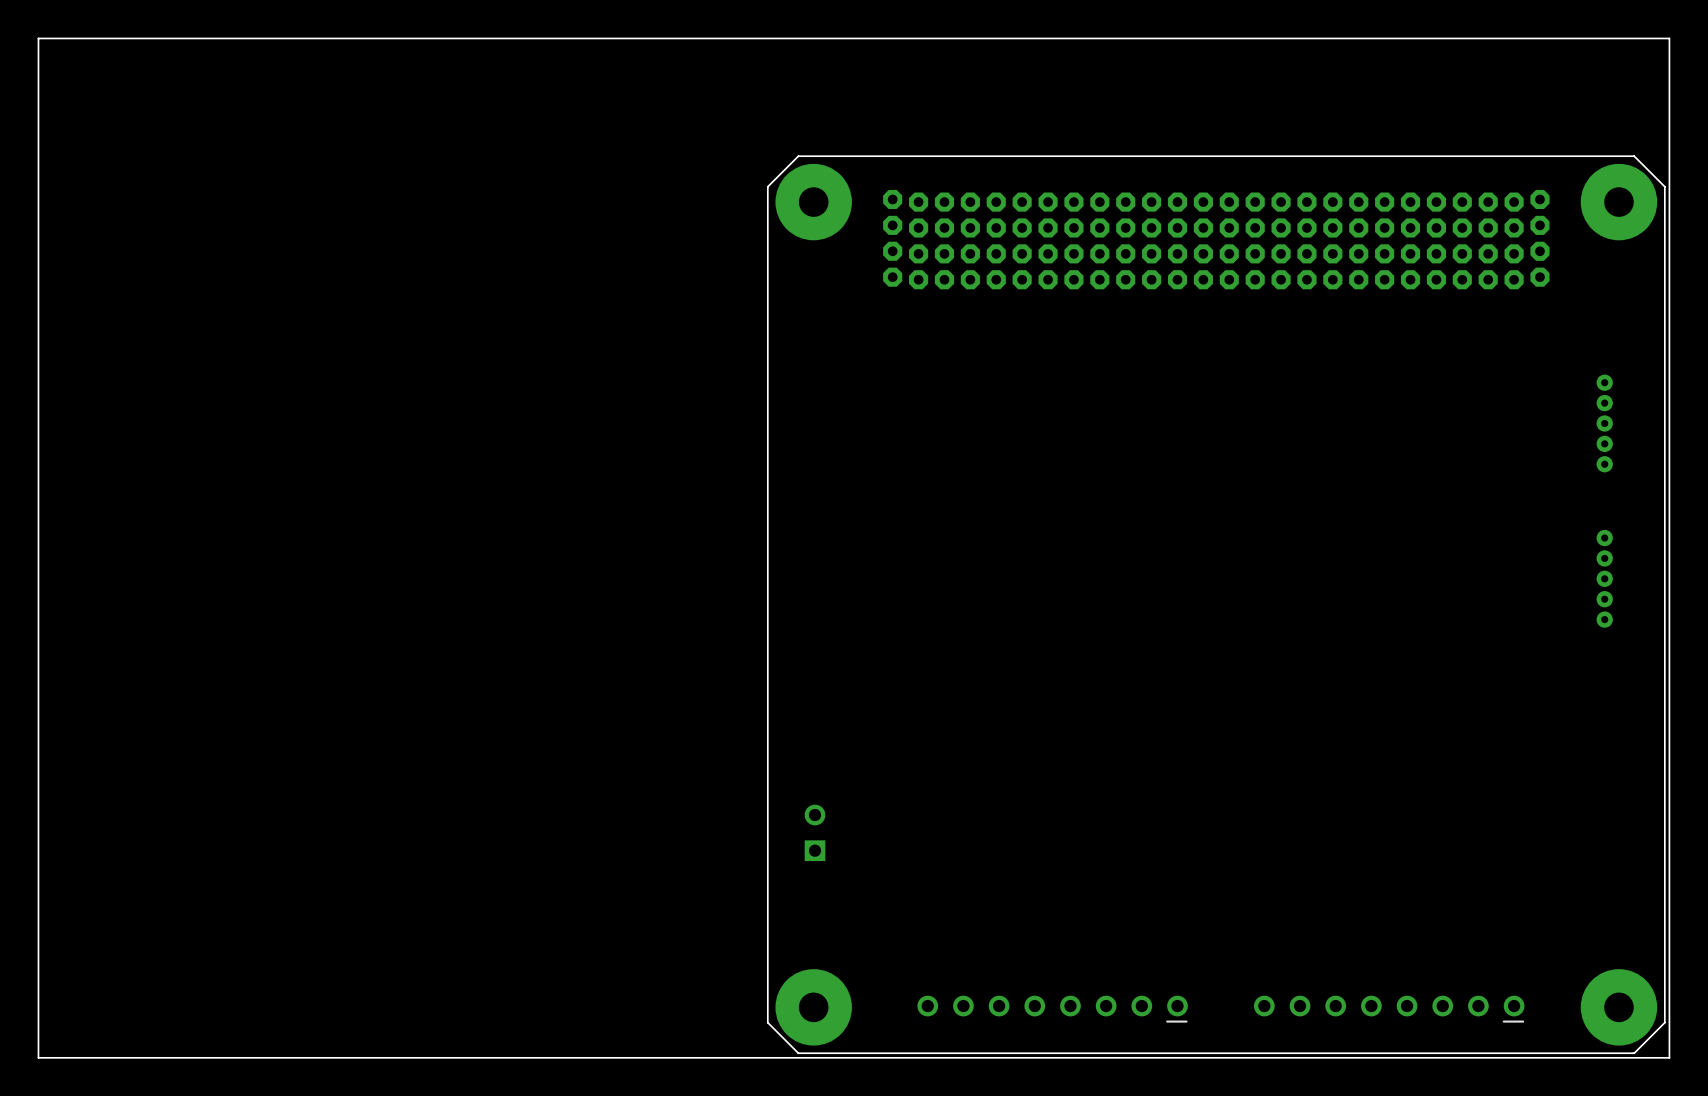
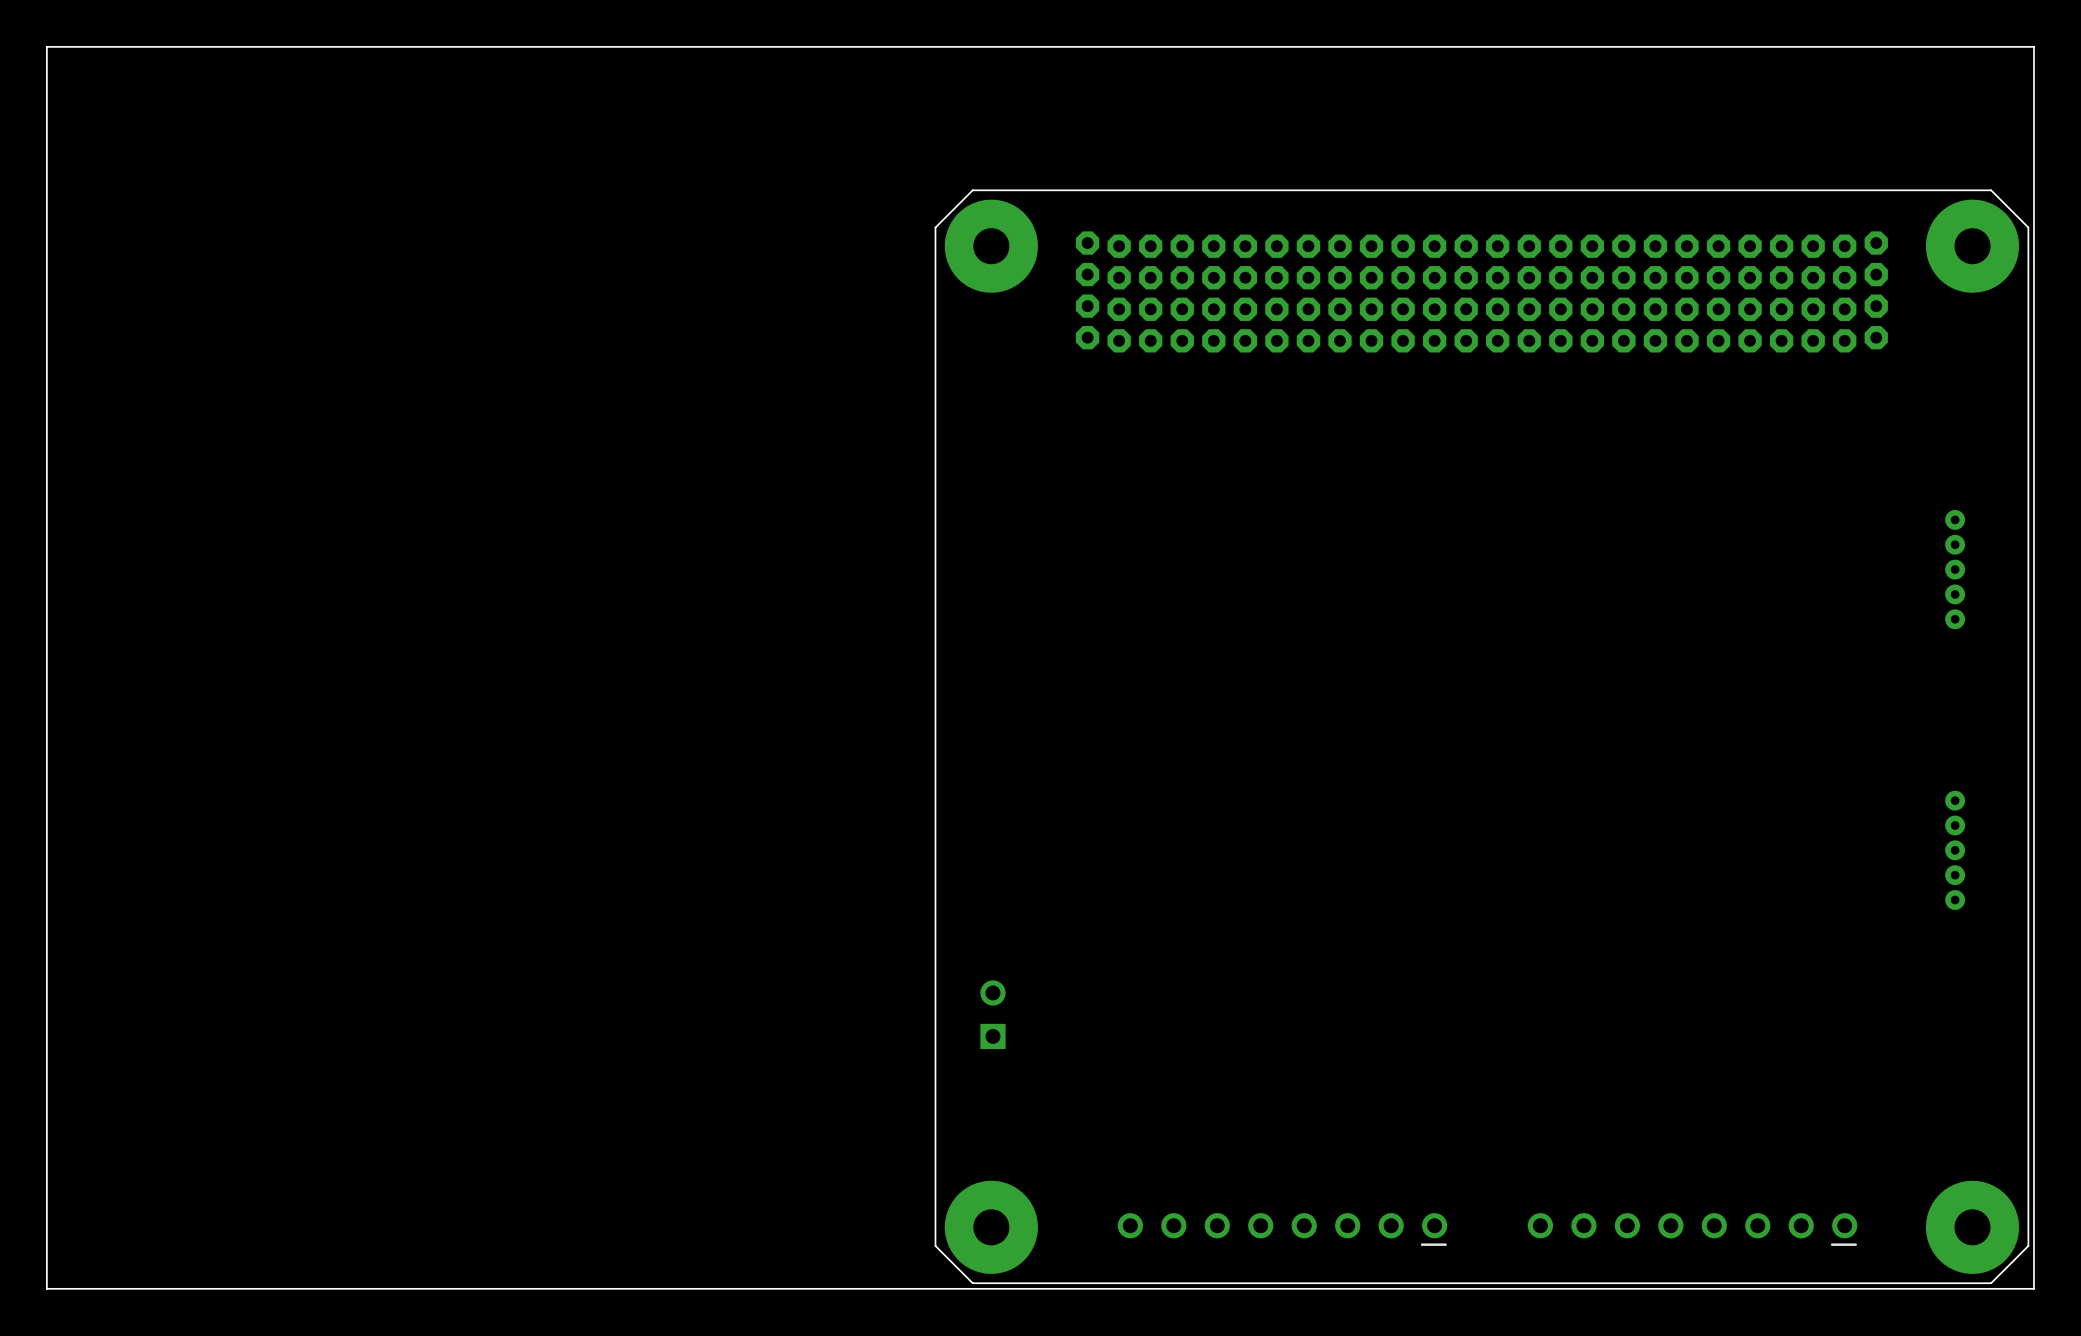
part position: (1604, 423) -> (1955, 569)
part: (1604, 578) -> none
part: none -> (1955, 850)

